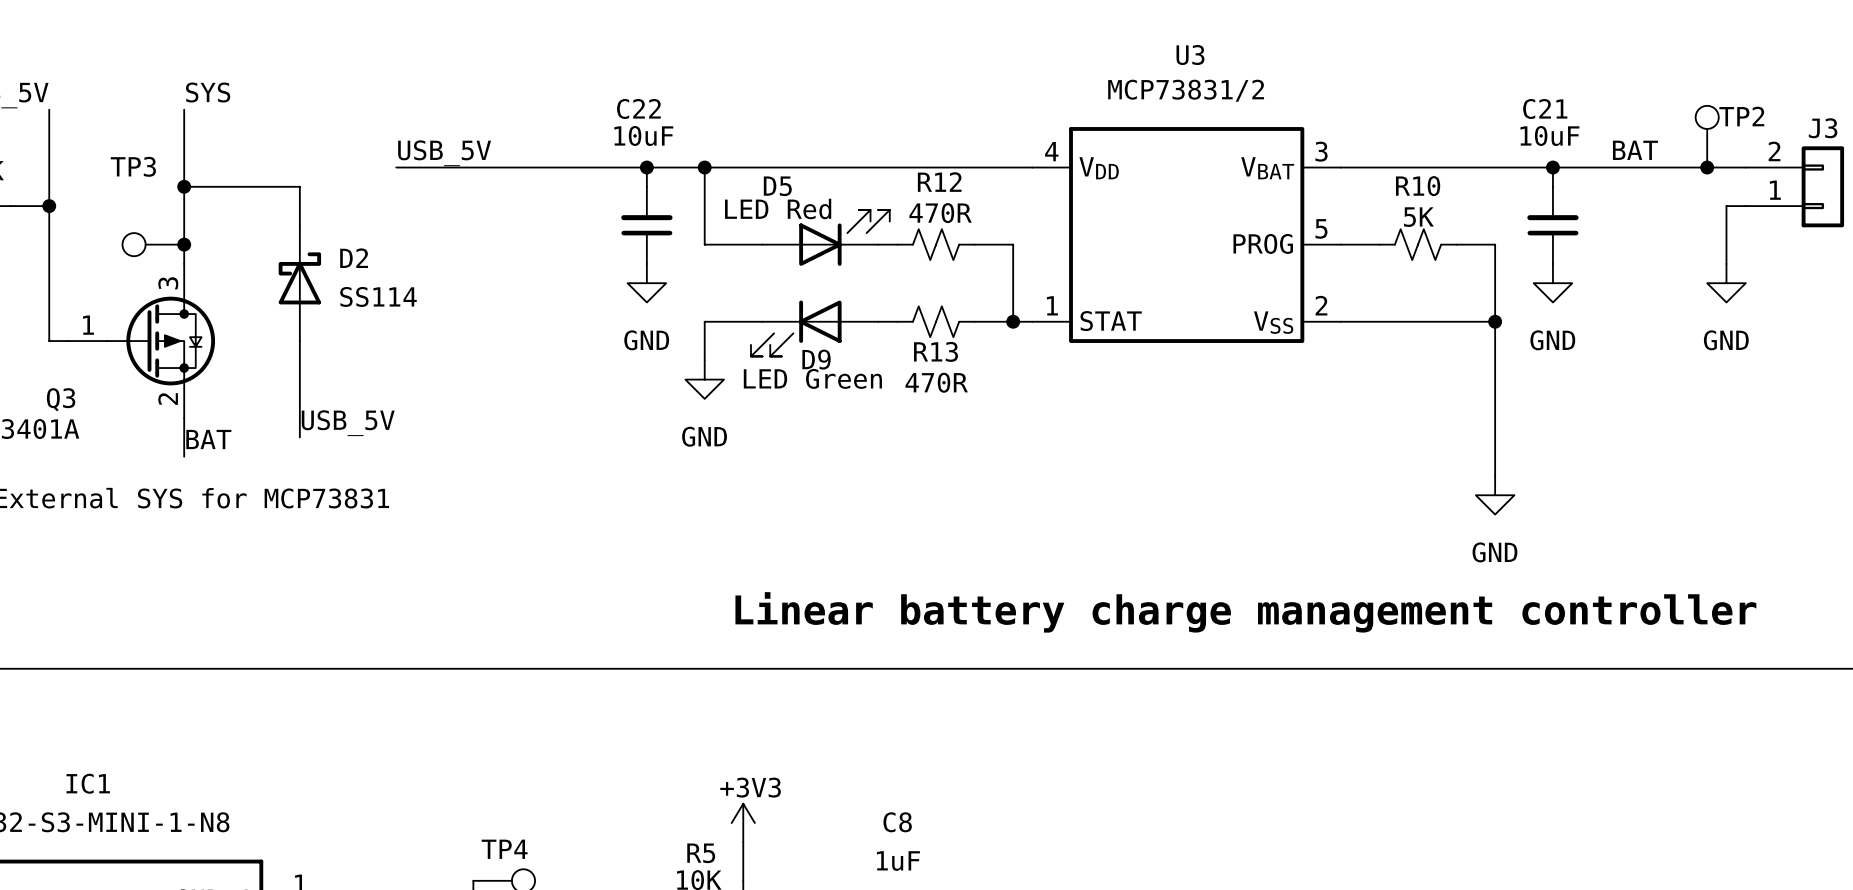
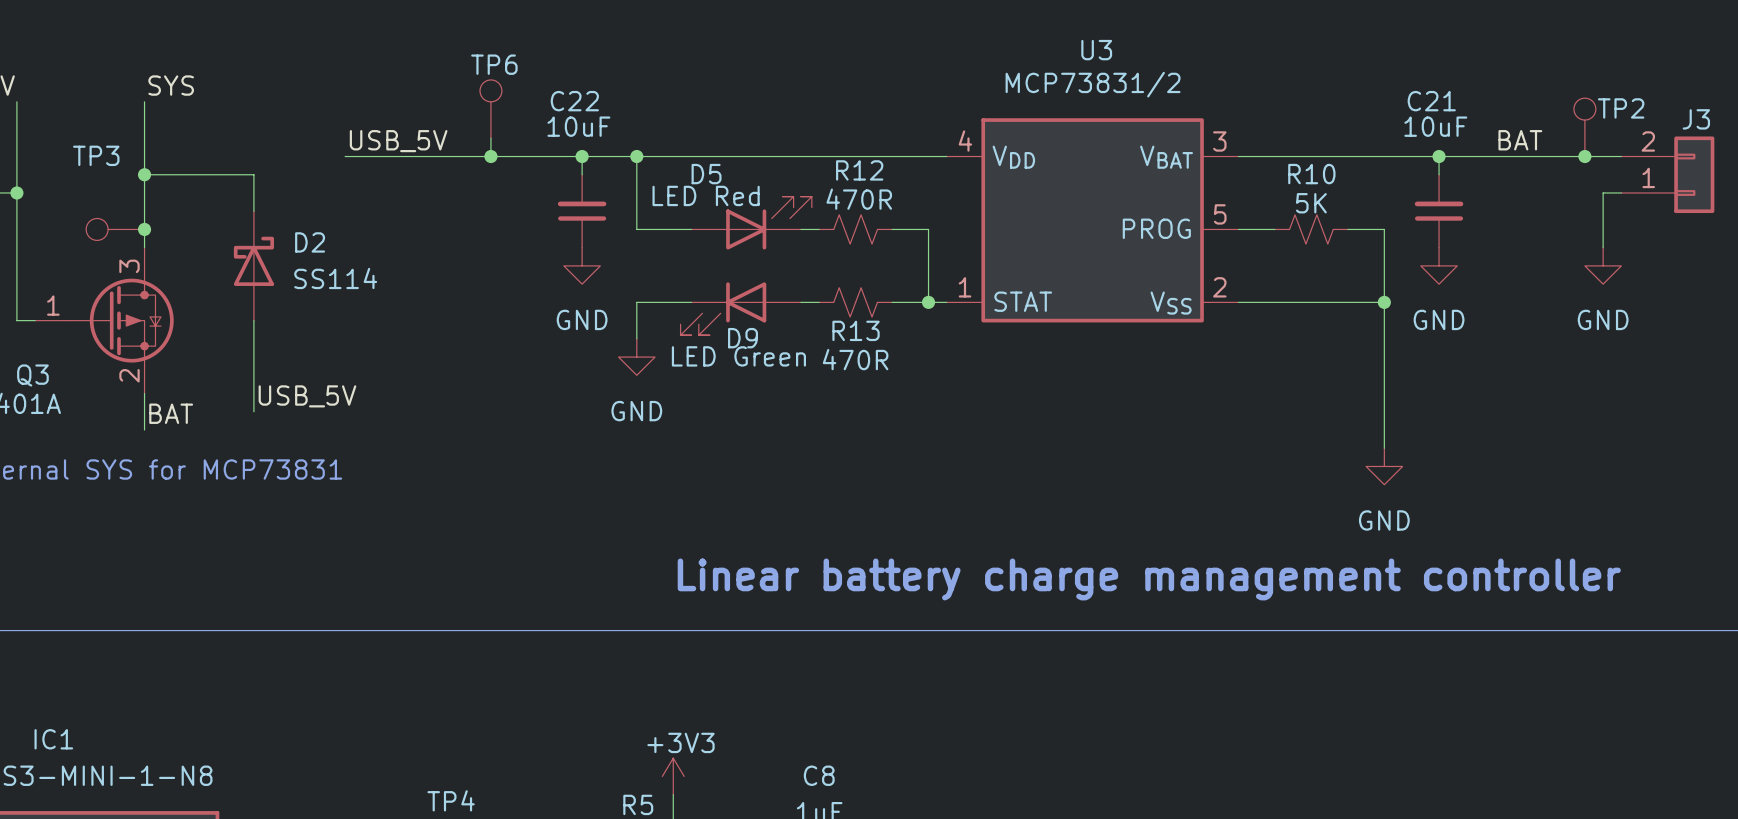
TP6: none -> (490, 109)
wire: none -> (490, 138) (490, 156)
junction: none -> (490, 156)

